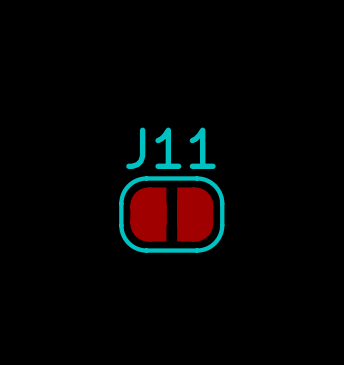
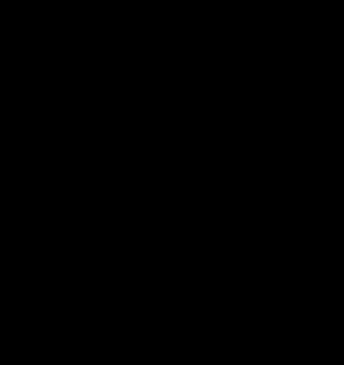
J11: (171, 214) -> none

